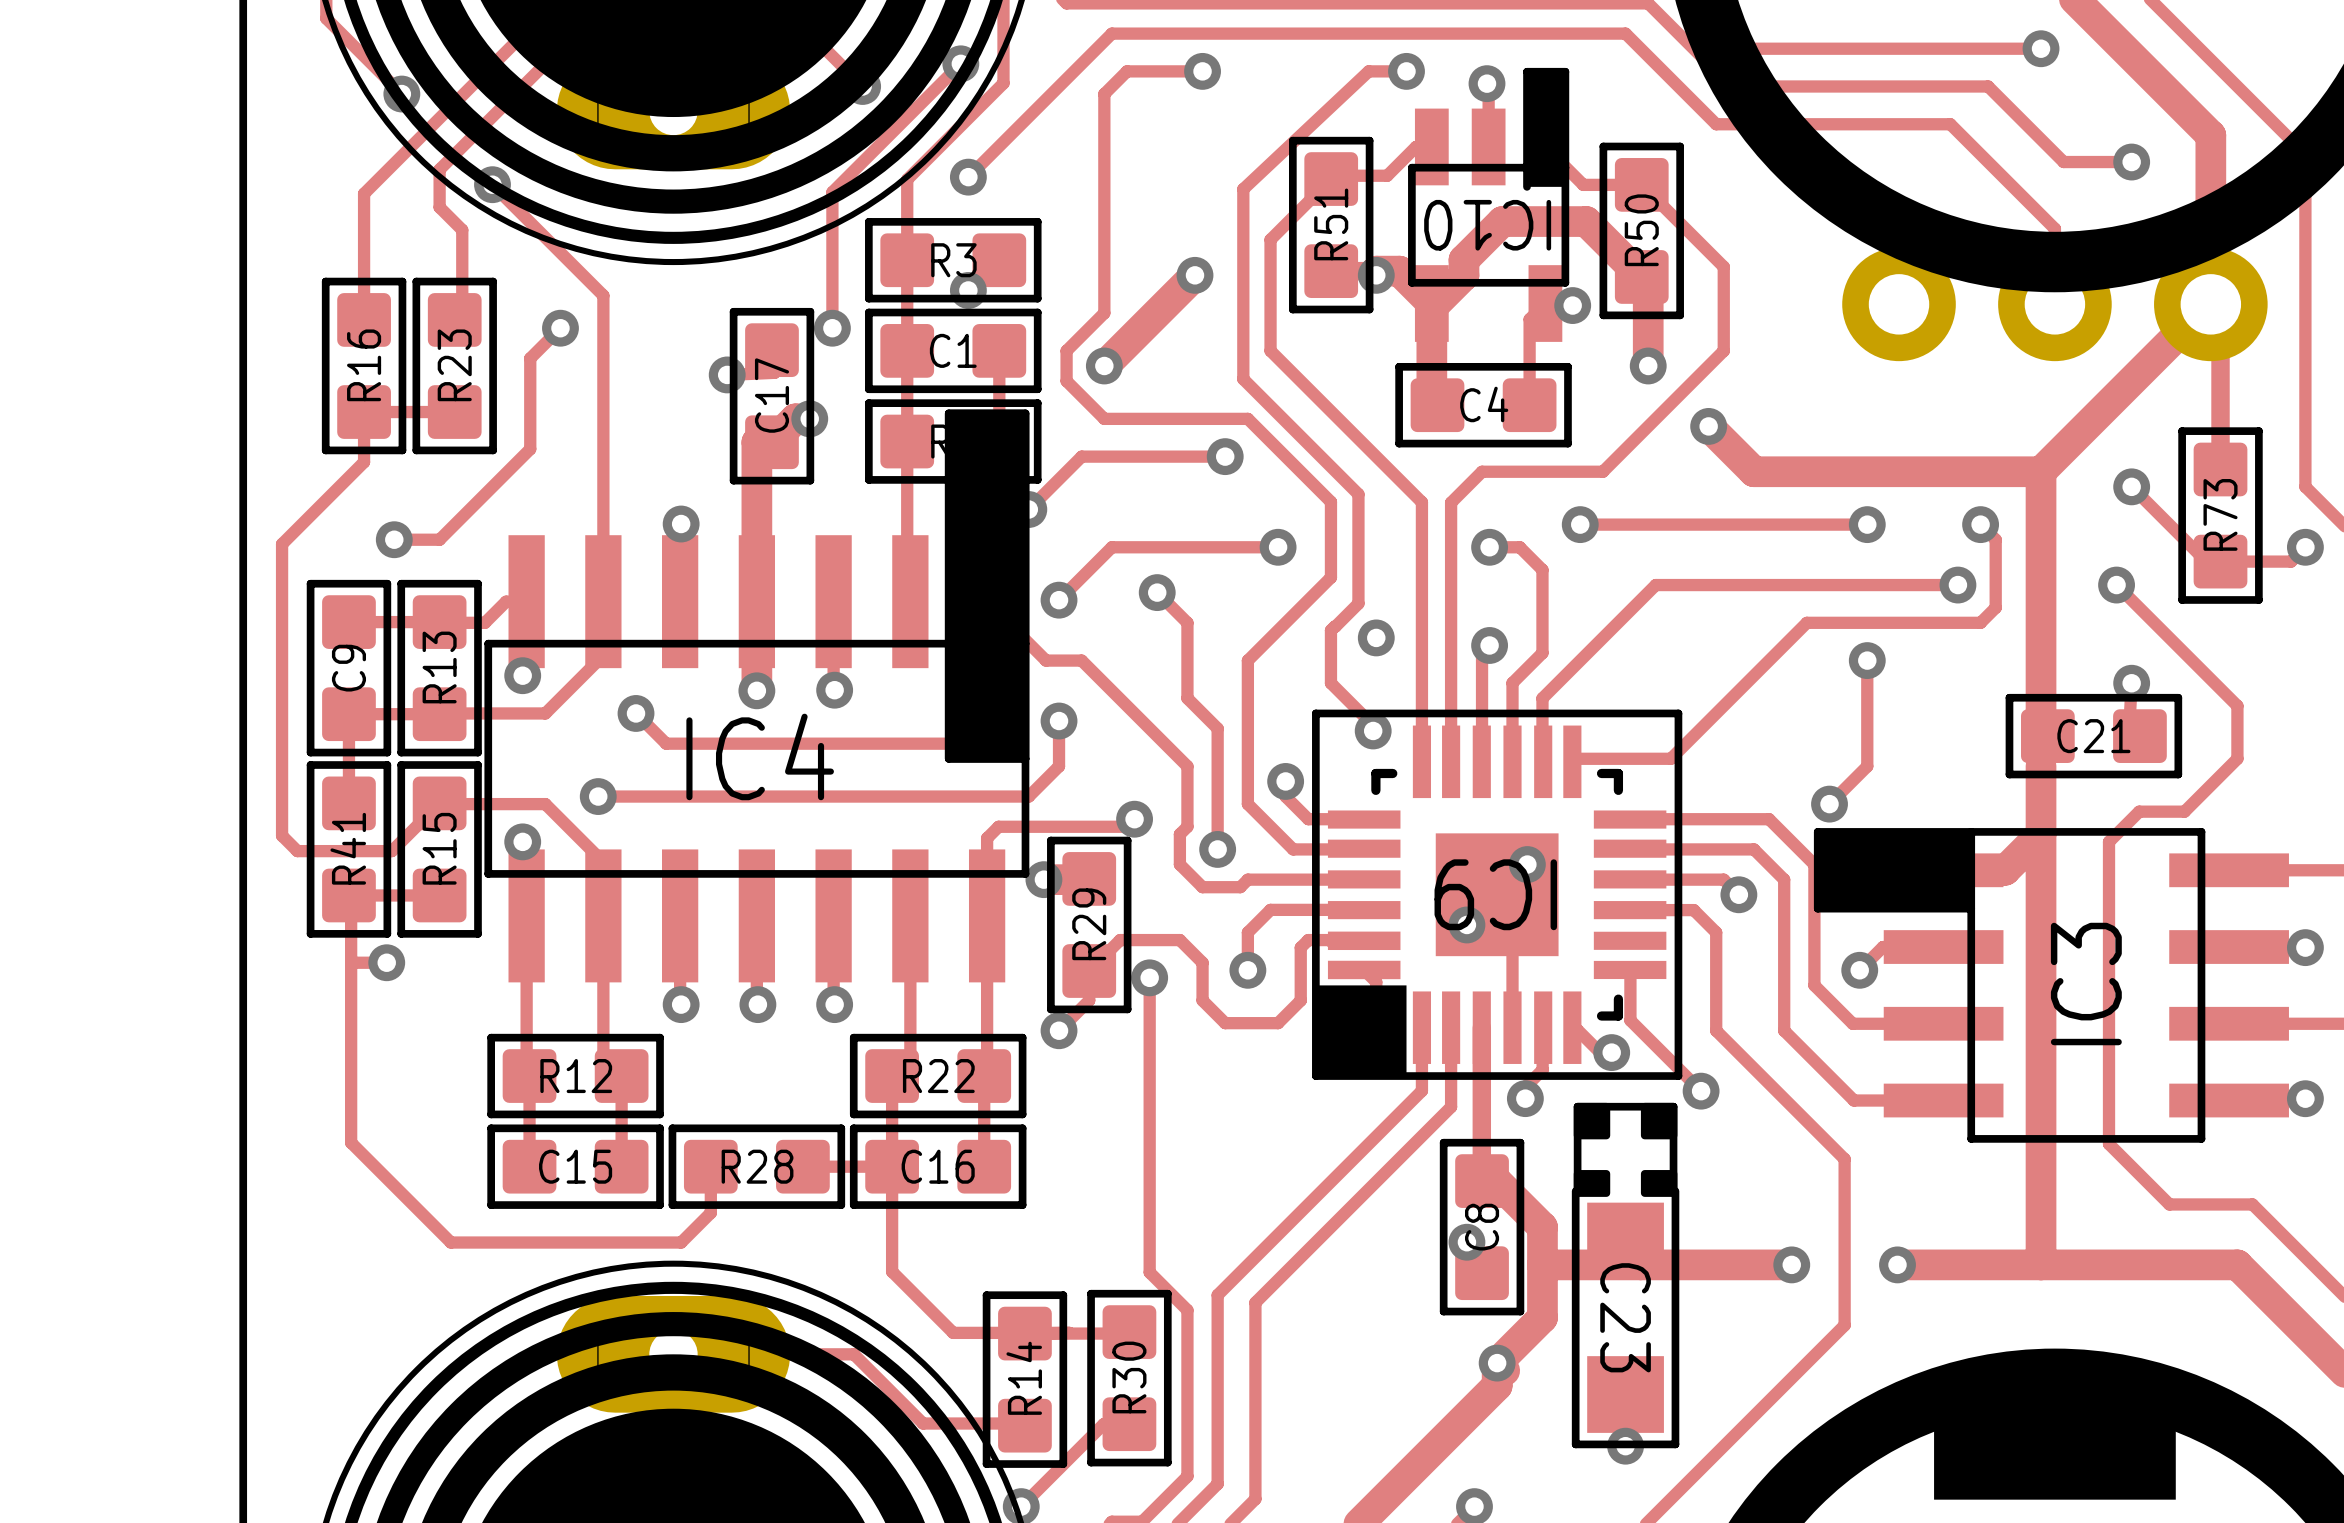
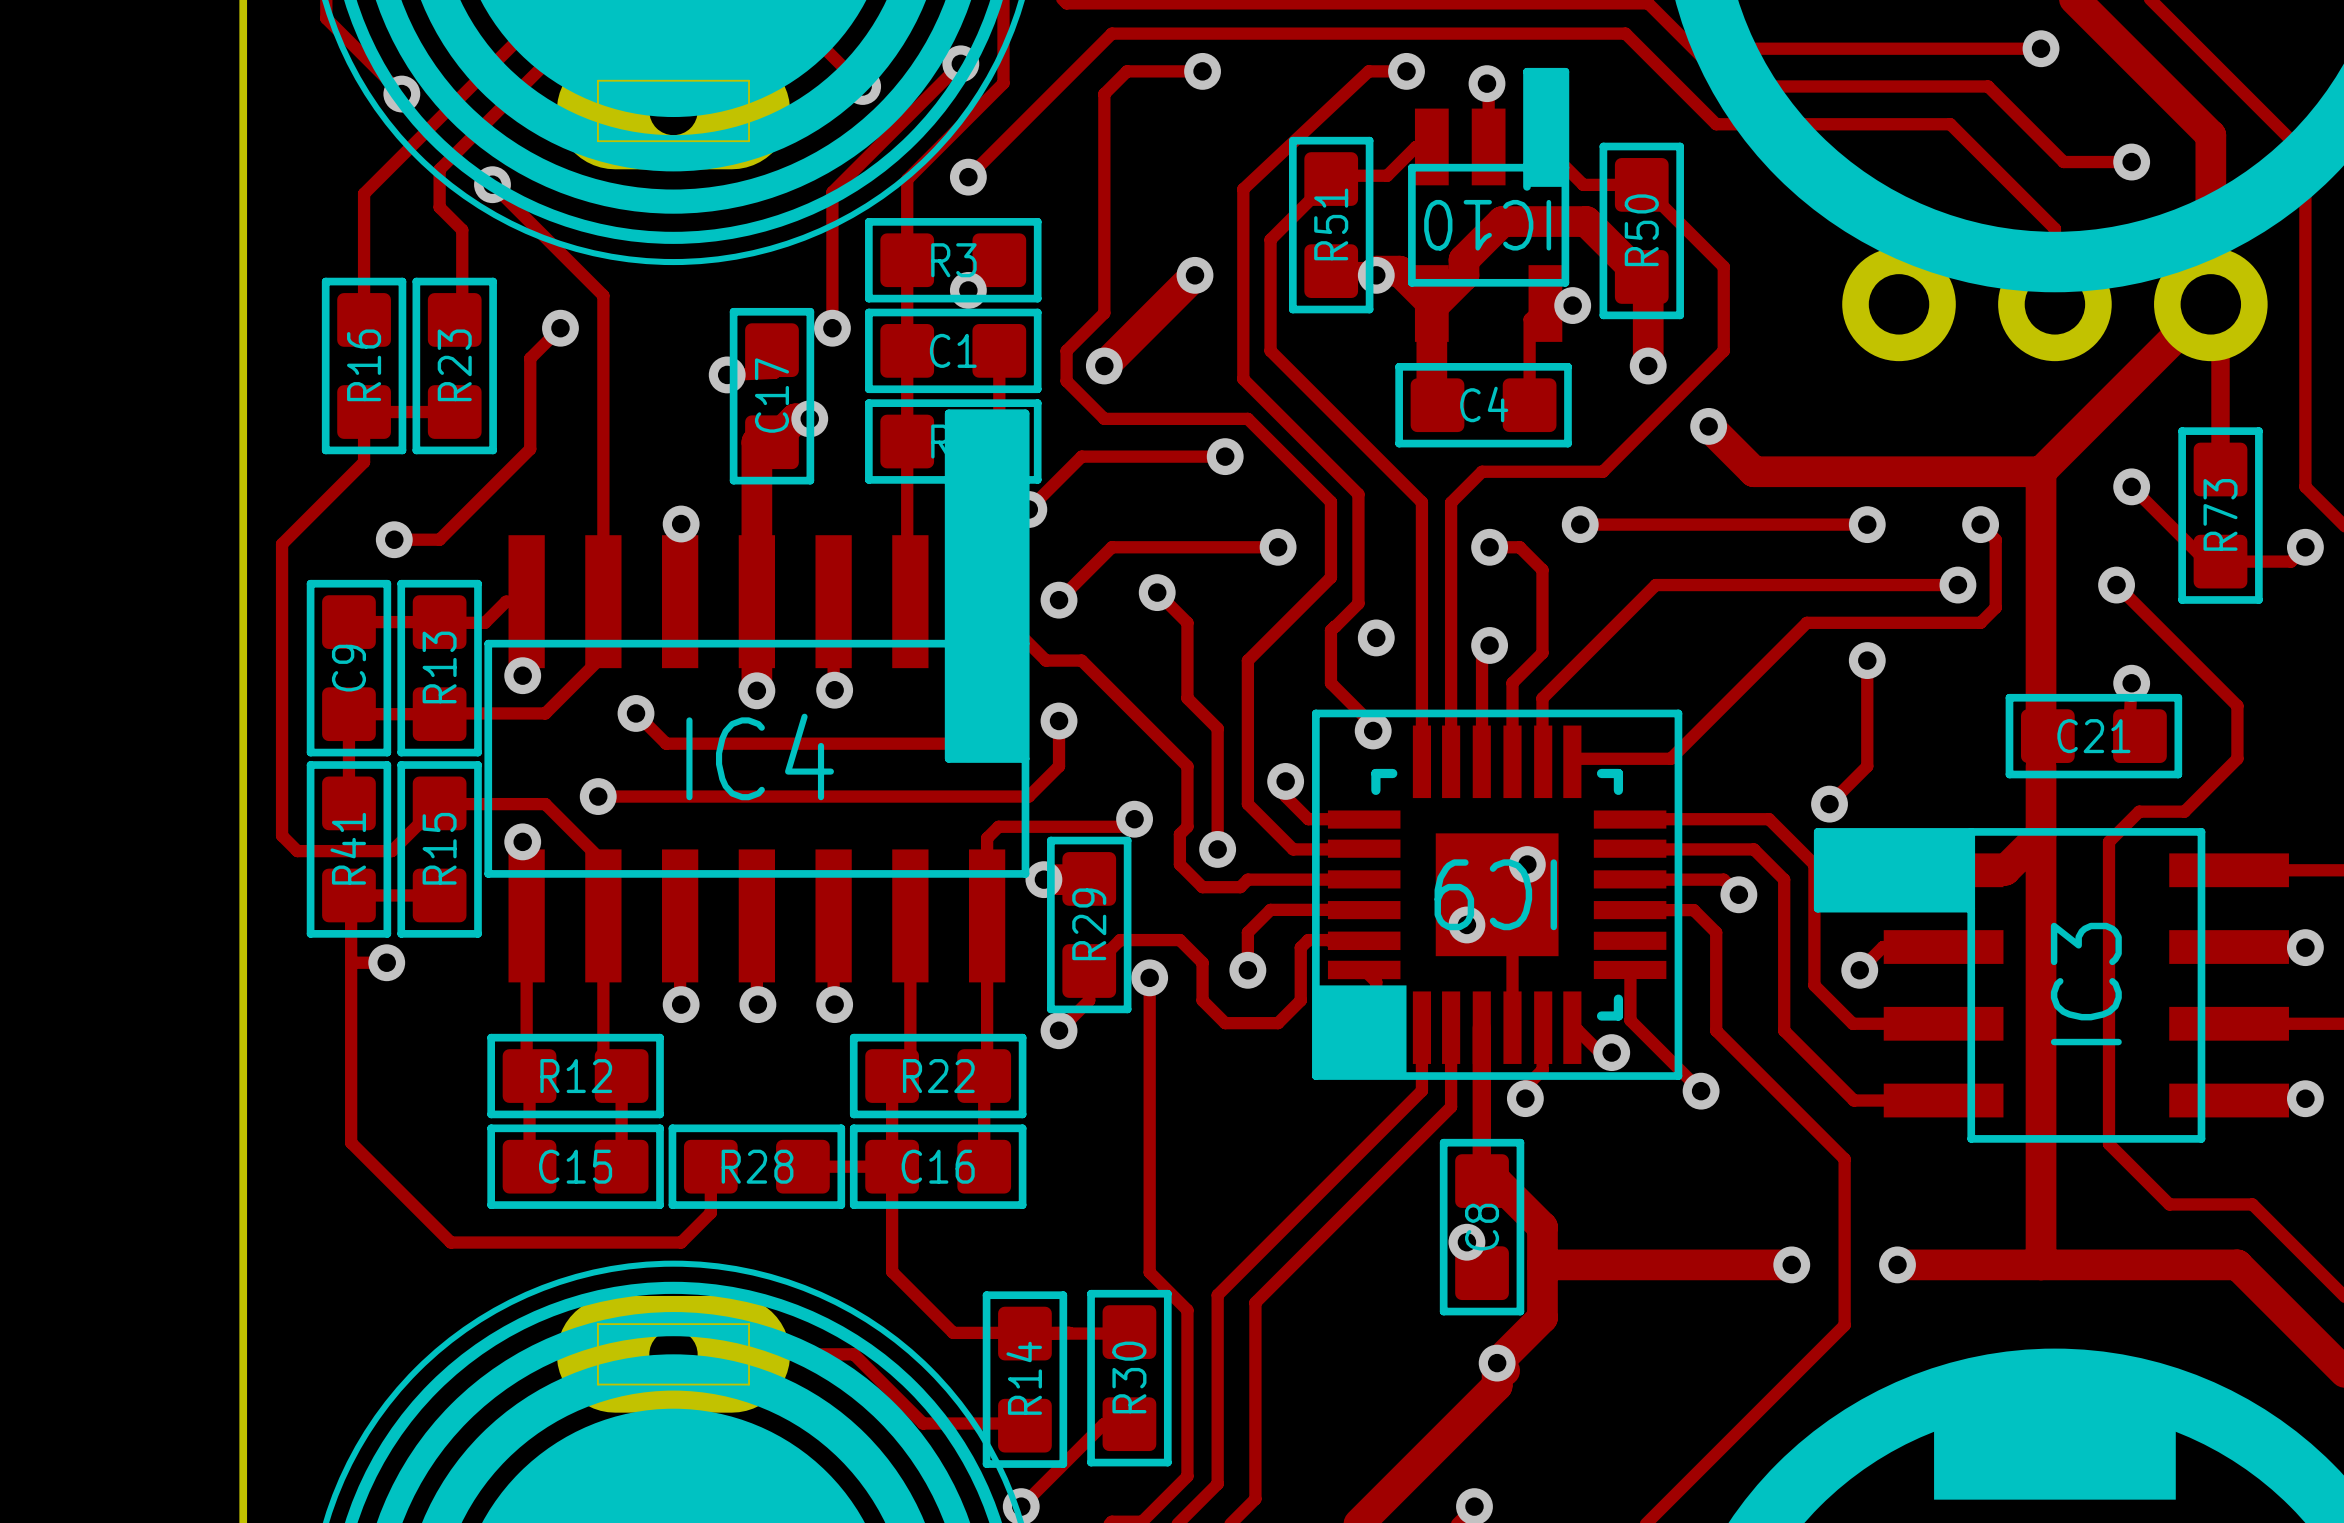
C23: (1625, 1275) -> none
via: (1625, 1446) -> none

